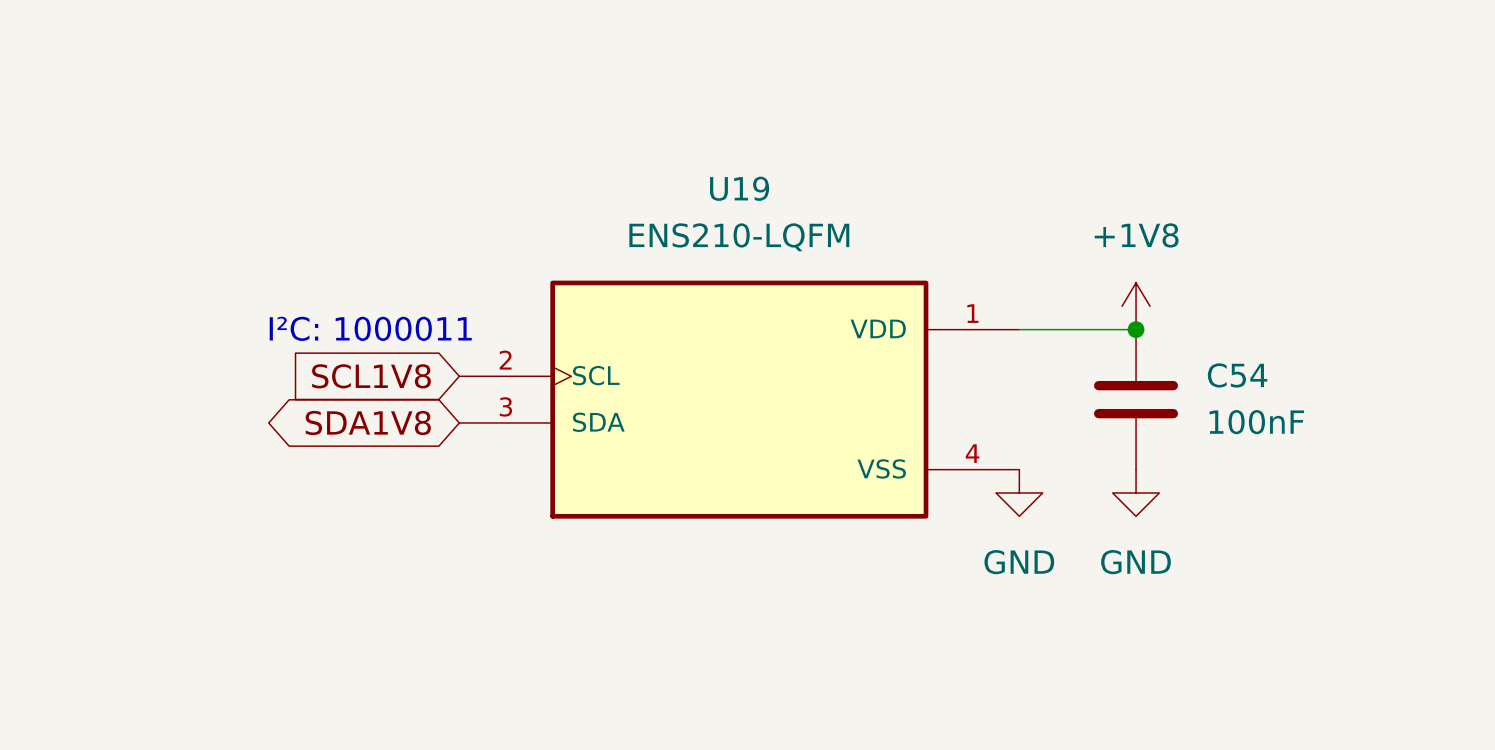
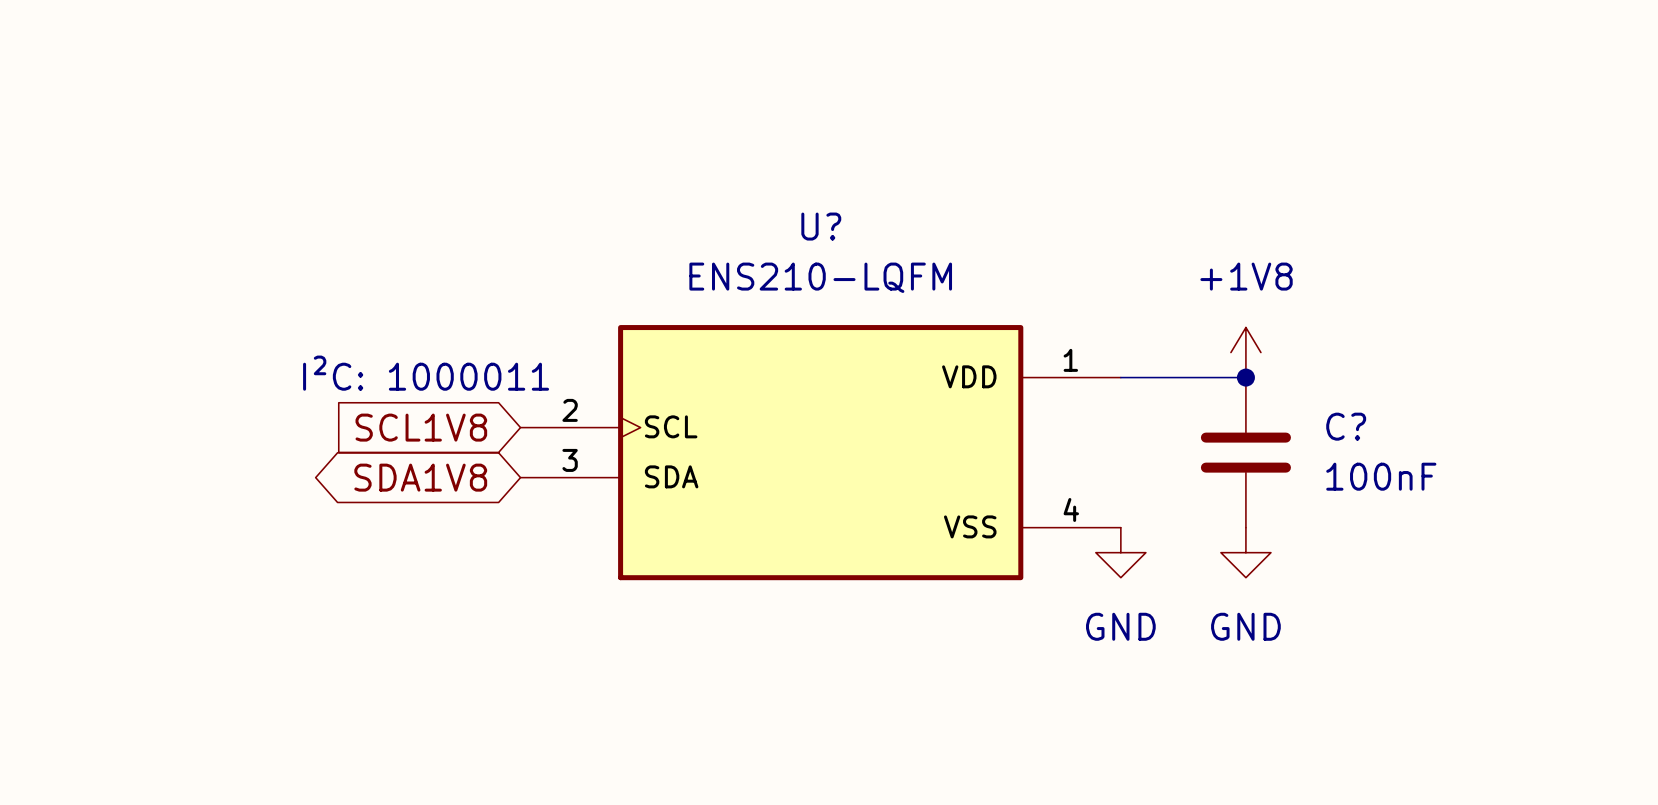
U19 name: U19 (739, 188) -> U? (821, 226)
C54 name: C54 (1237, 375) -> C? (1346, 426)

